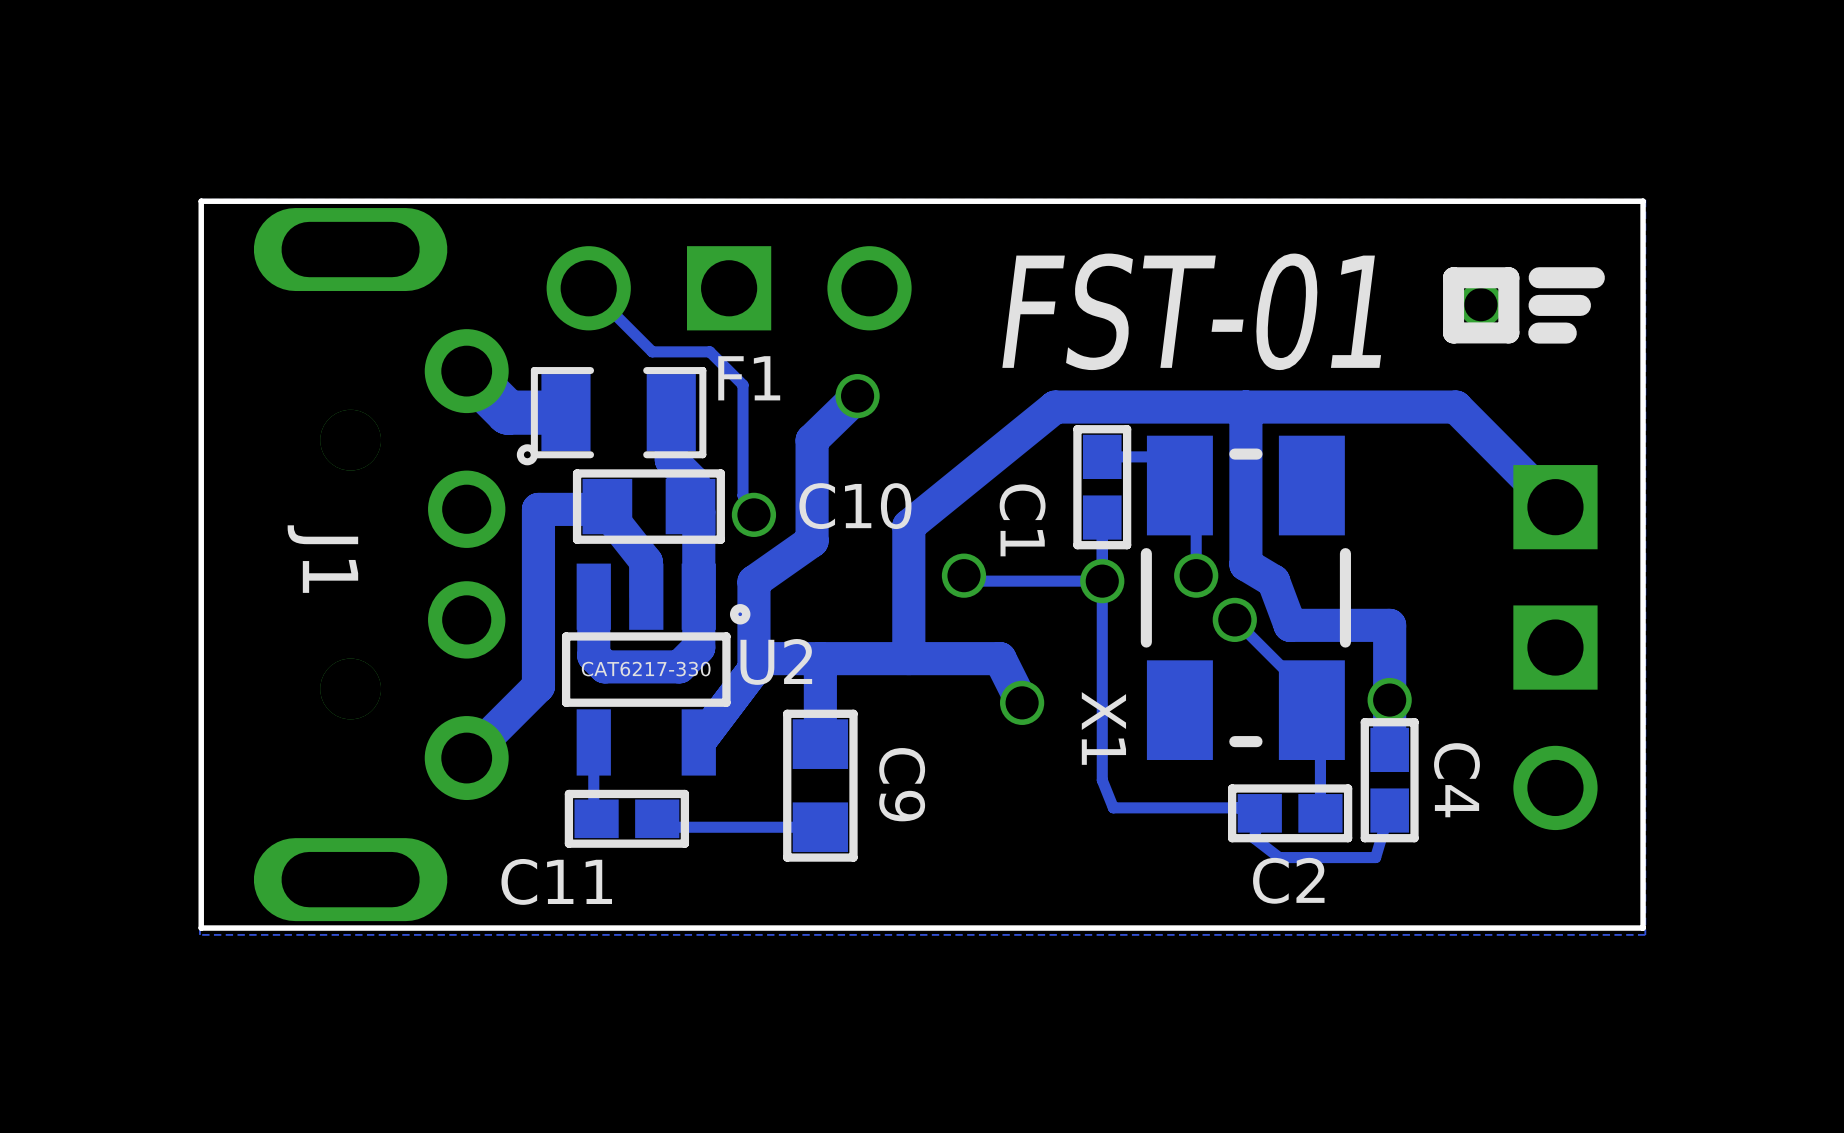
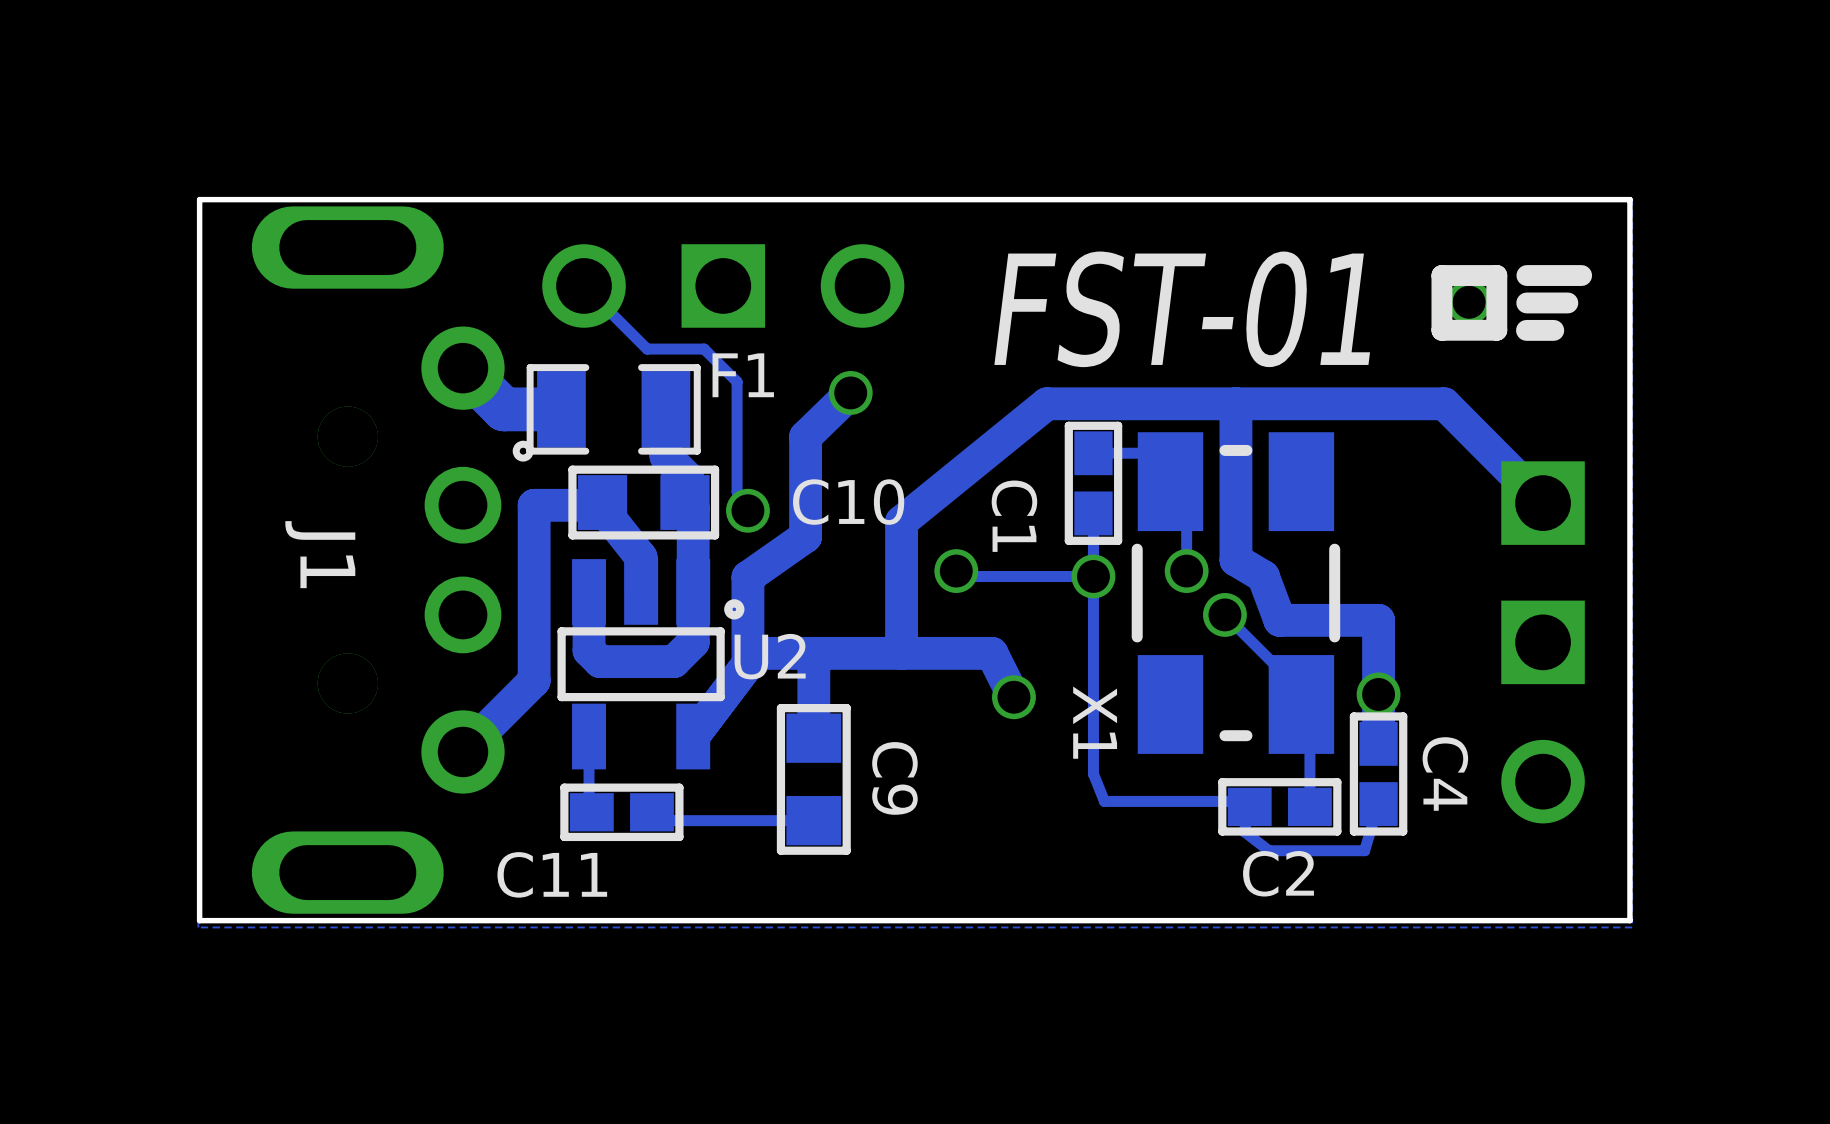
U2 value: CAT6217-330 (646, 669) -> none

